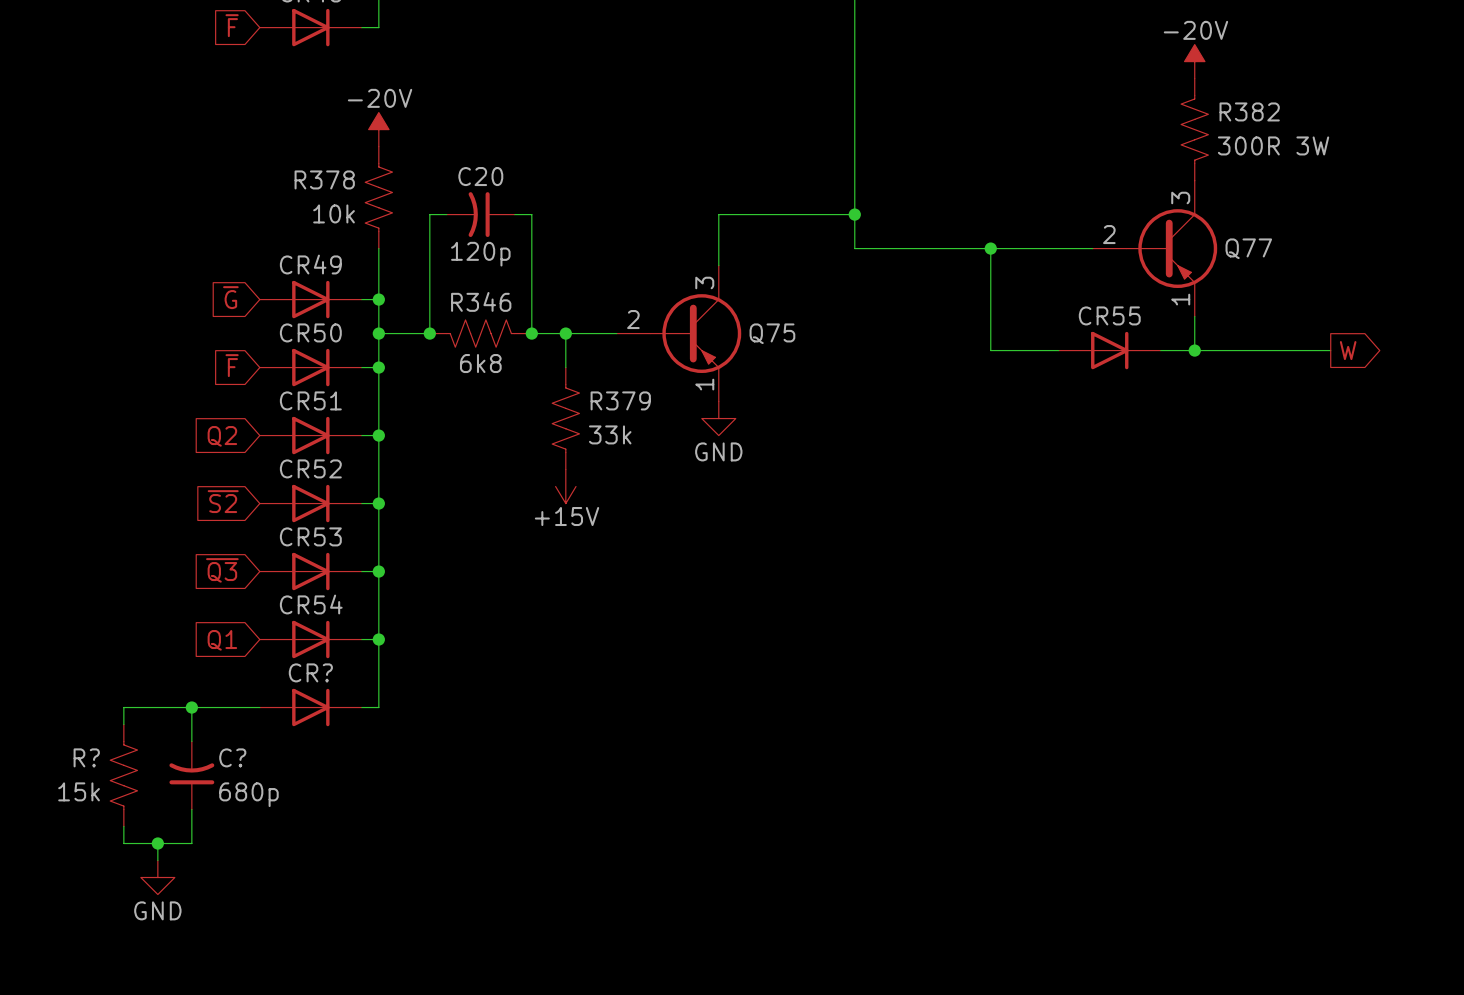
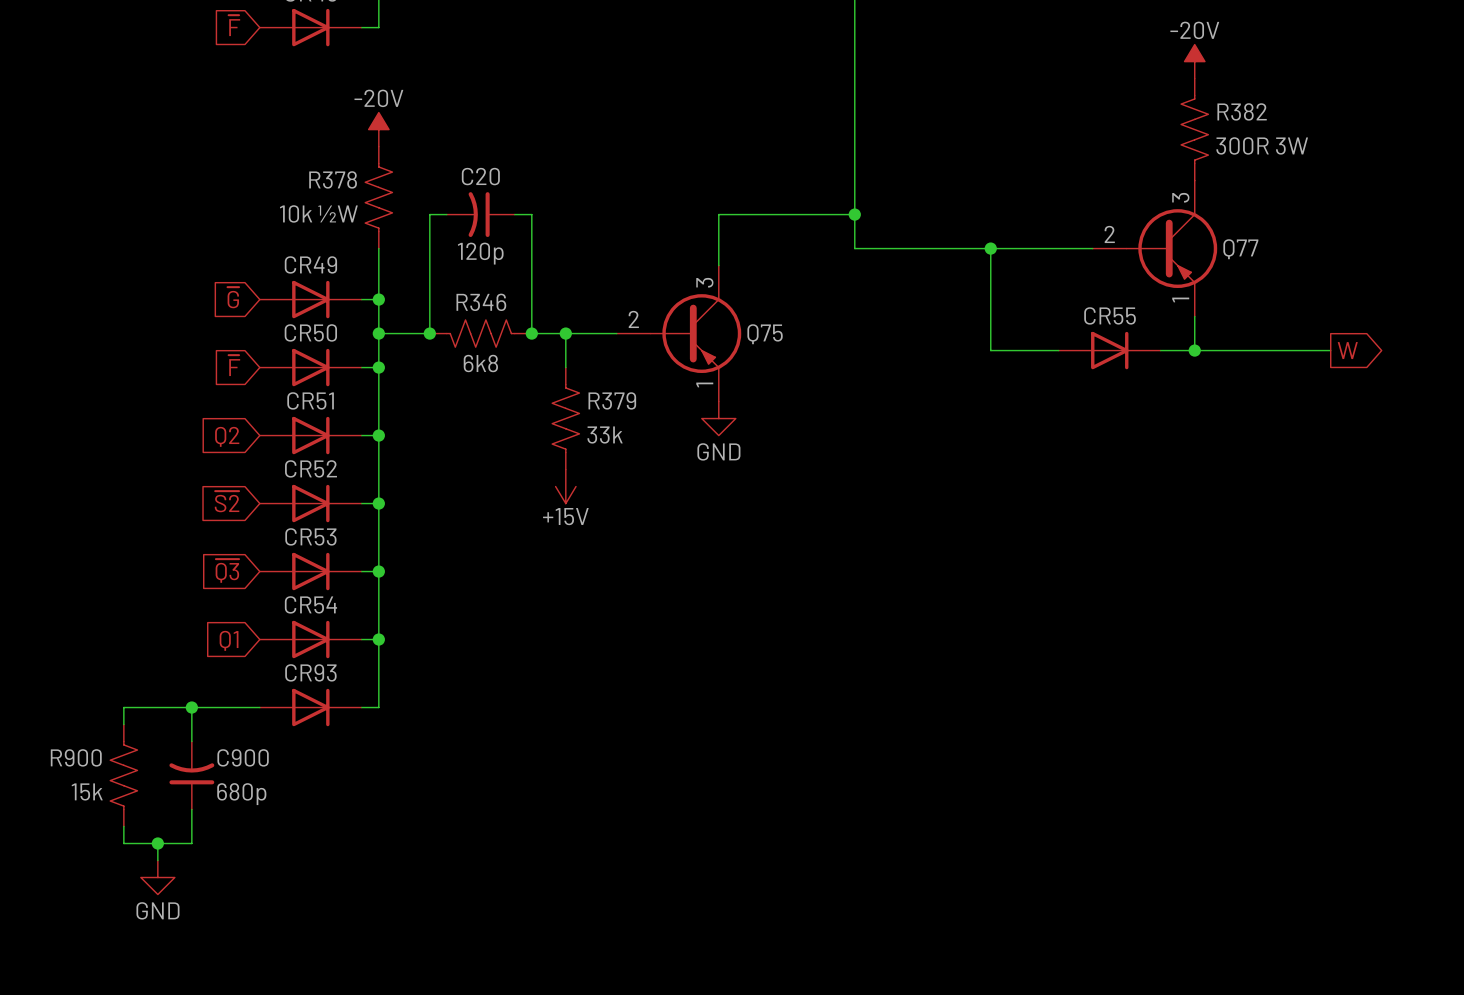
R378 value: 10k (334, 213) -> 10k ½W (318, 213)
CR? name: CR? (310, 672) -> CR93 (310, 672)
R? name: R? (86, 757) -> R900 (76, 757)
C? name: C? (232, 757) -> C900 (243, 757)

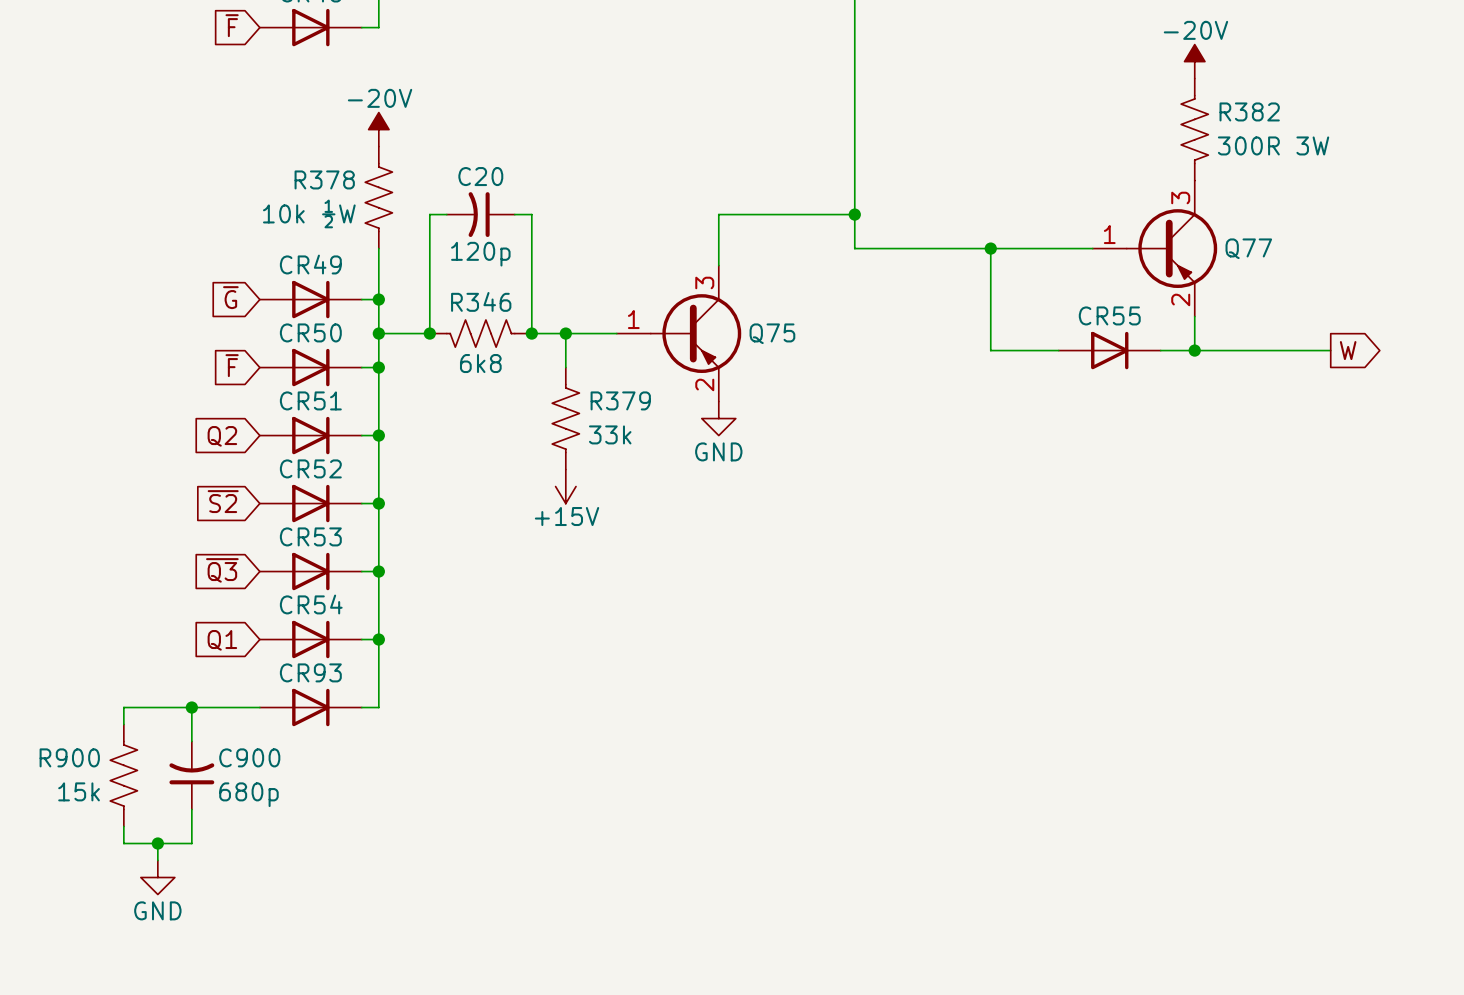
Q77 pin number: 2 (1109, 234) -> 1 (1109, 234)
Q77 pin number: 1 (1180, 299) -> 2 (1180, 299)
Q75 pin number: 2 (633, 319) -> 1 (633, 319)
Q75 pin number: 1 (704, 384) -> 2 (704, 384)

